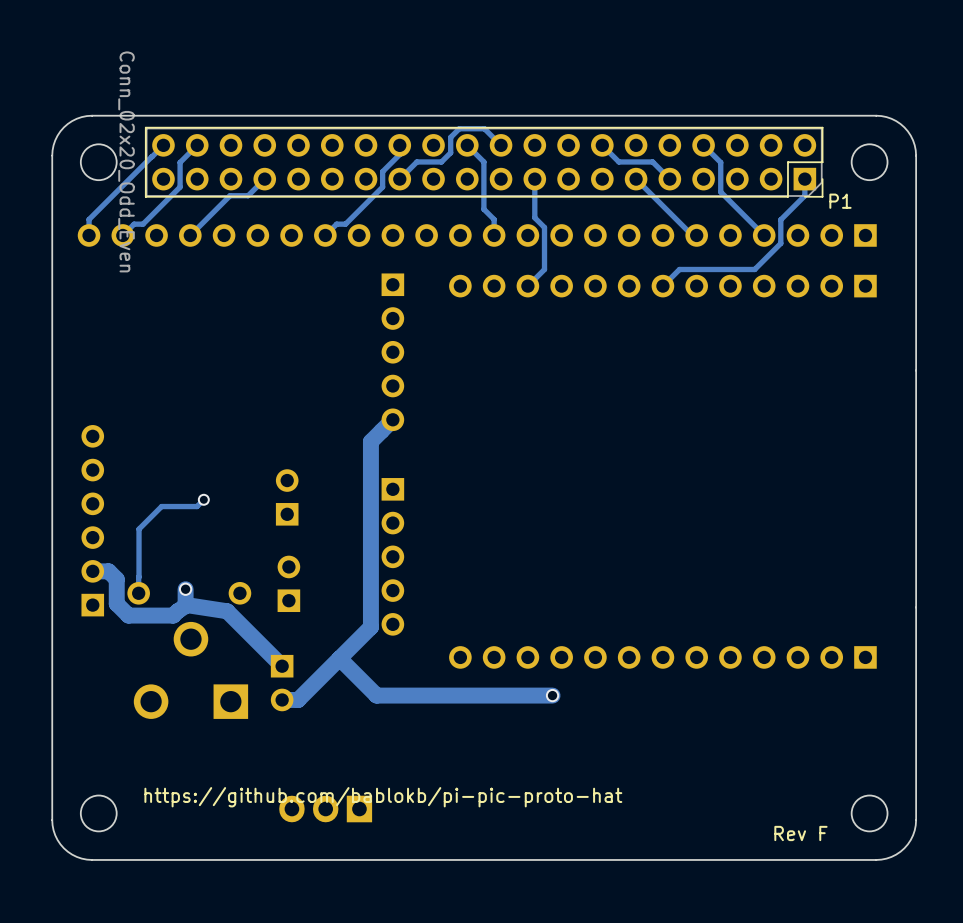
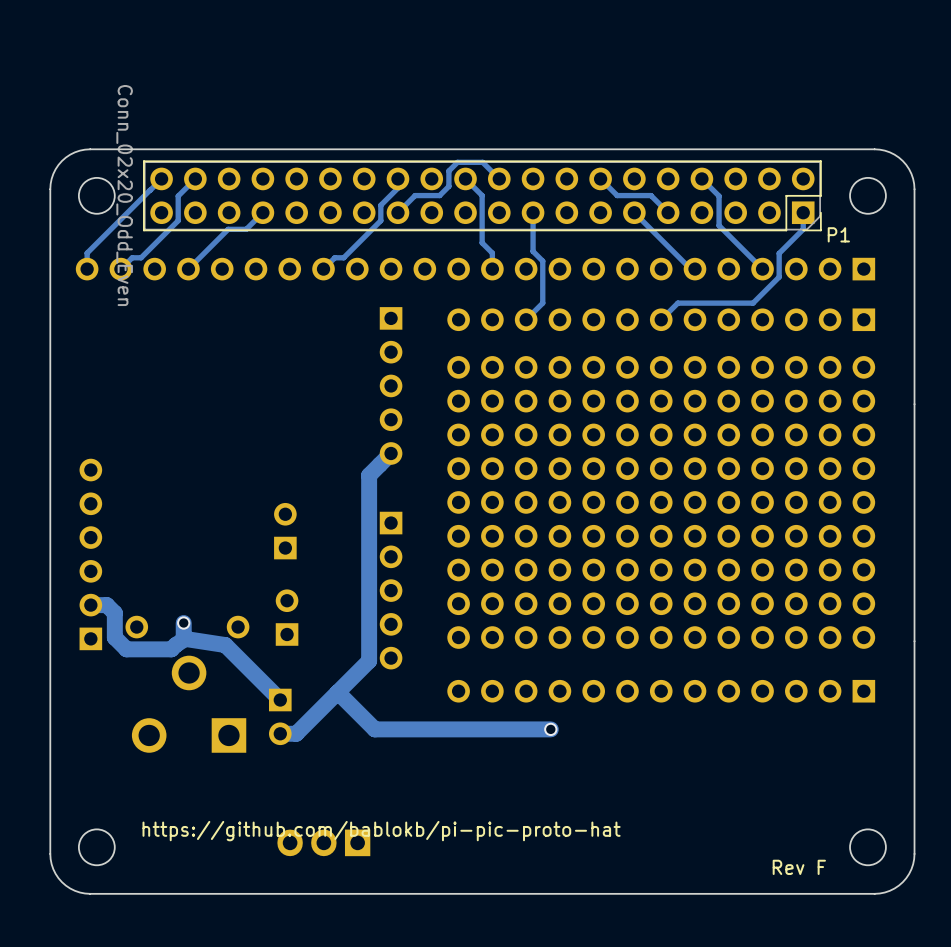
part: none -> (661, 502)
track: (203, 499) (197, 506) (161, 506) (139, 529) (138, 593) -> none
via: (203, 499) -> none

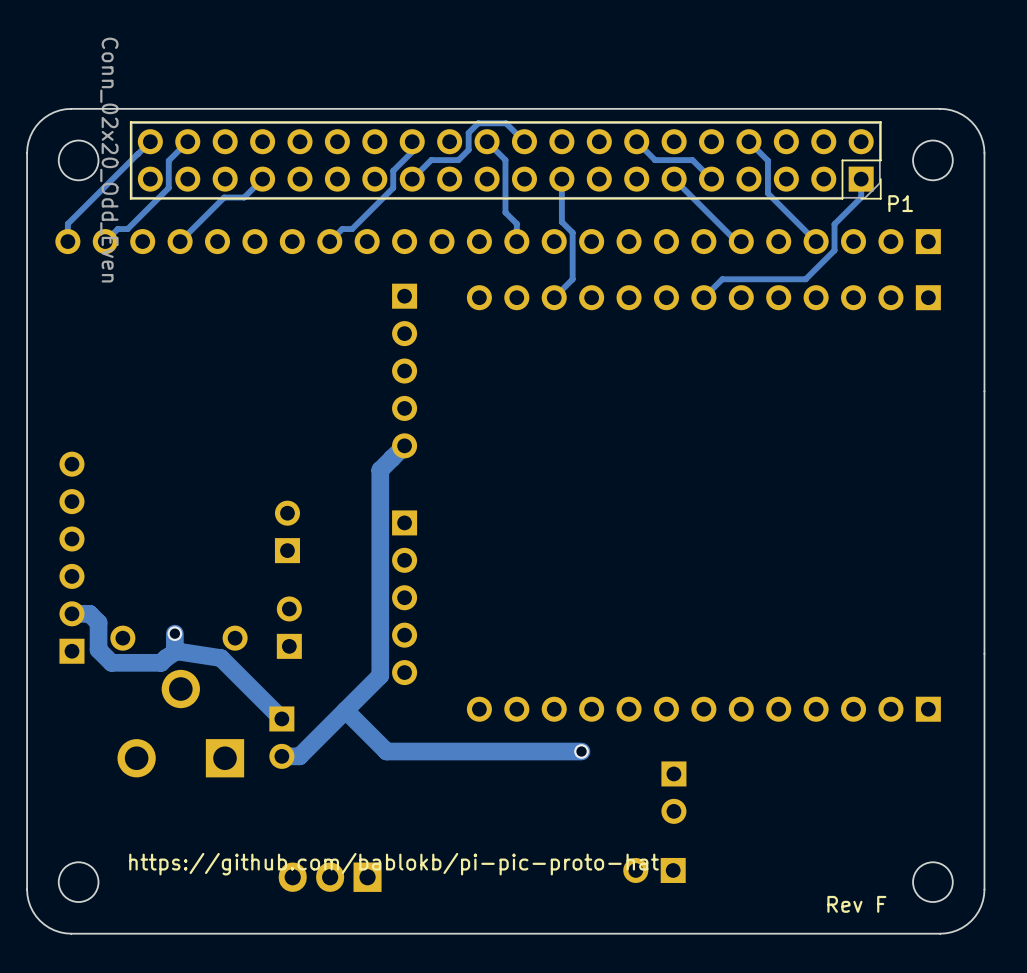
part: (661, 502) -> none
part: none -> (673, 792)
part: none -> (654, 870)

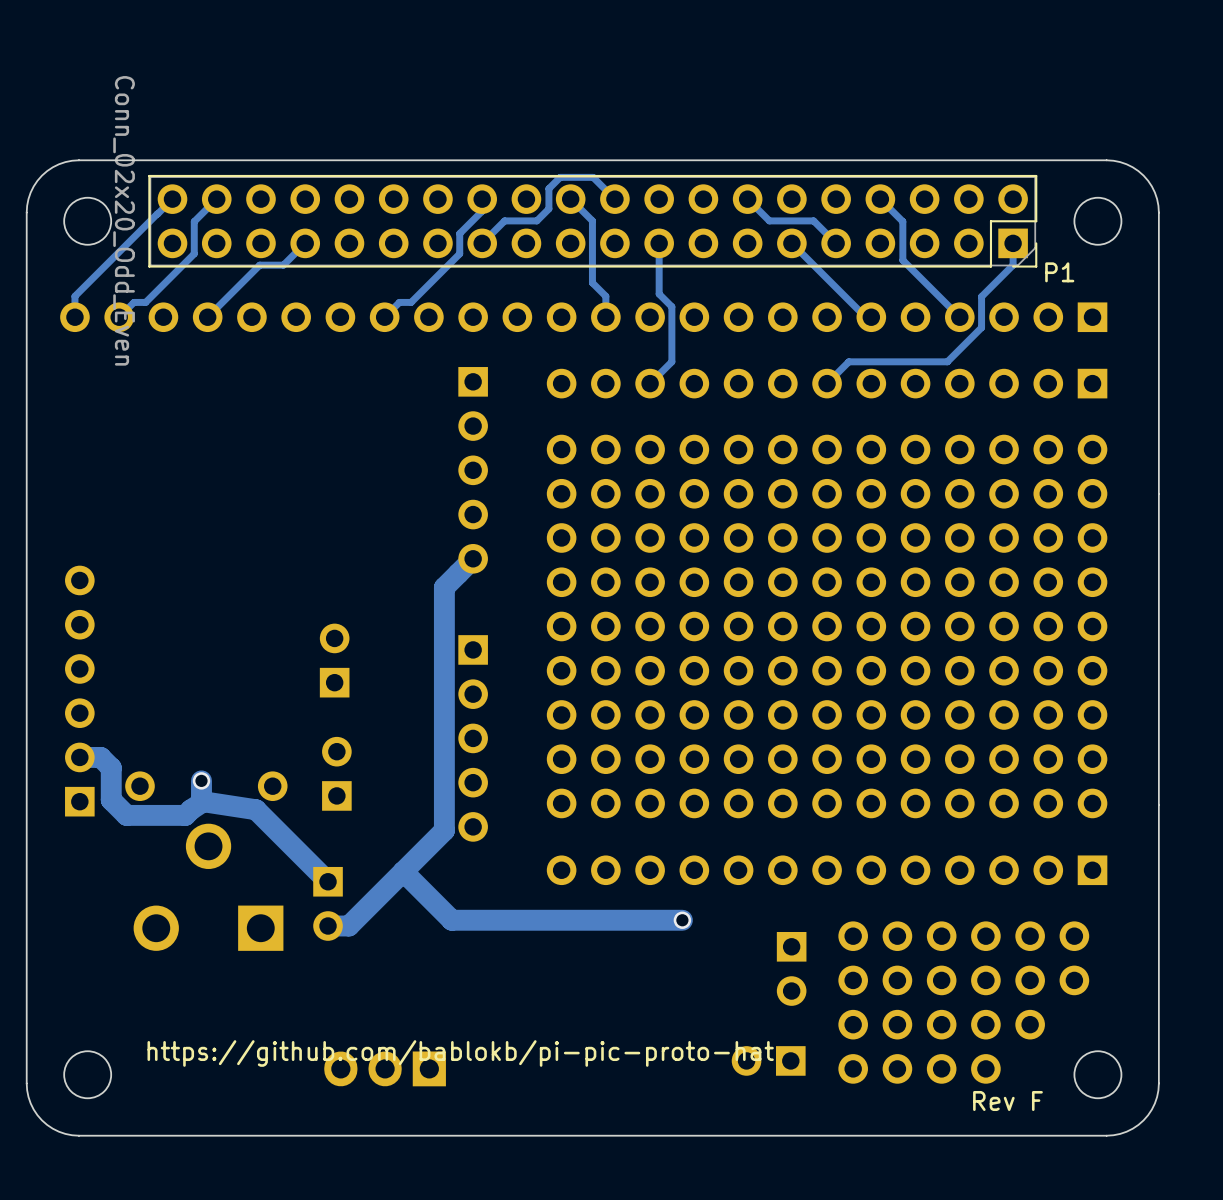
part: none -> (827, 626)
part: none -> (1074, 958)
part: none -> (941, 980)
part: none -> (919, 1068)

